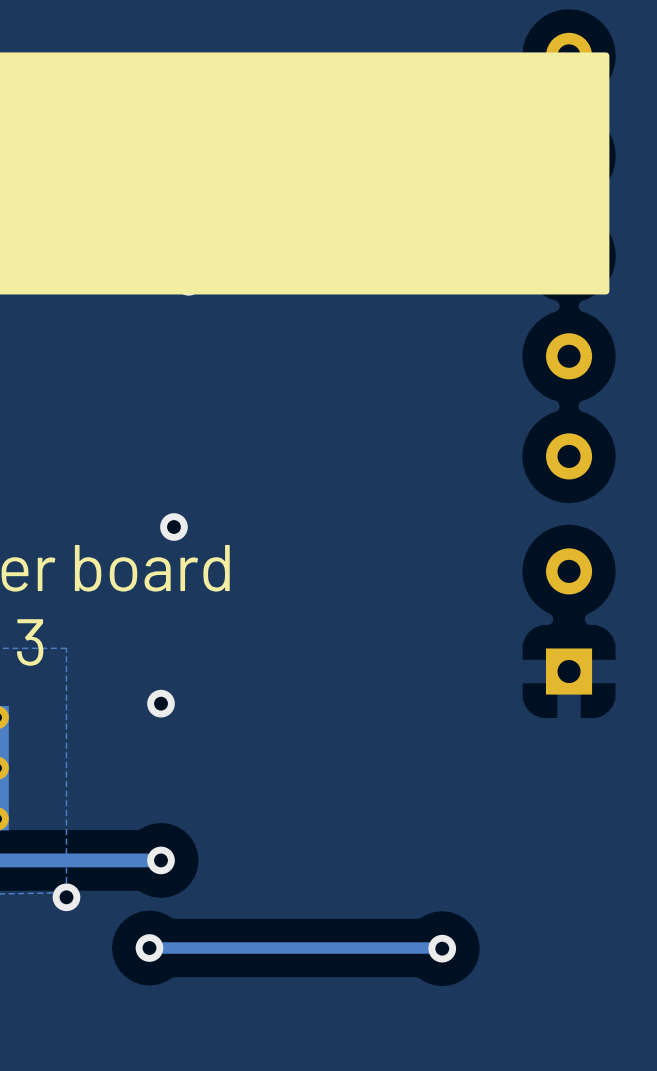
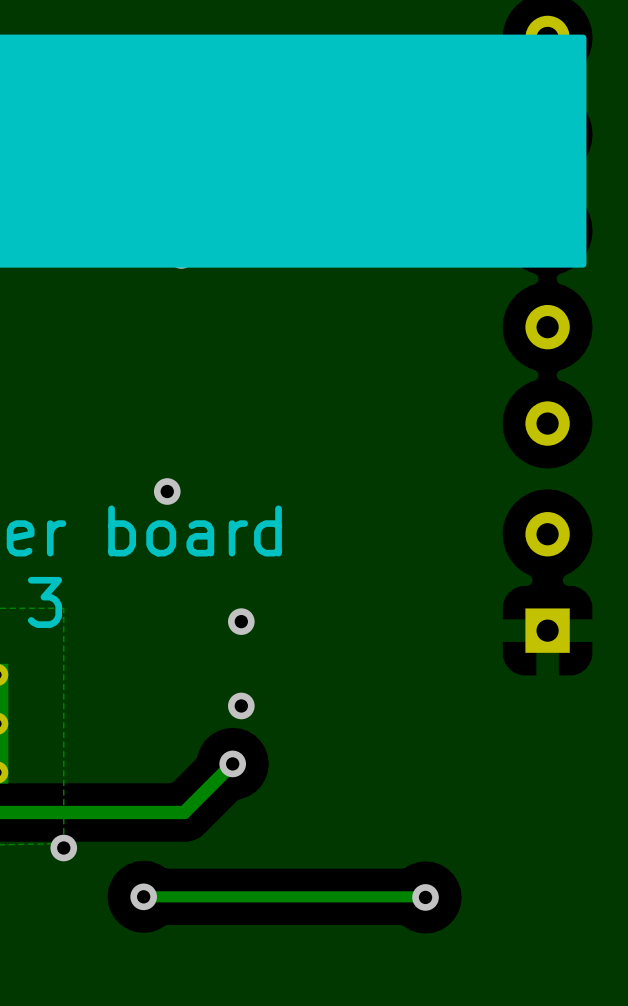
via: none -> (241, 621)
via: (161, 703) -> none
via: none -> (241, 705)
track: none -> (232, 763) (184, 812) (154, 812)
via: none -> (232, 763)
via: (161, 860) -> none

